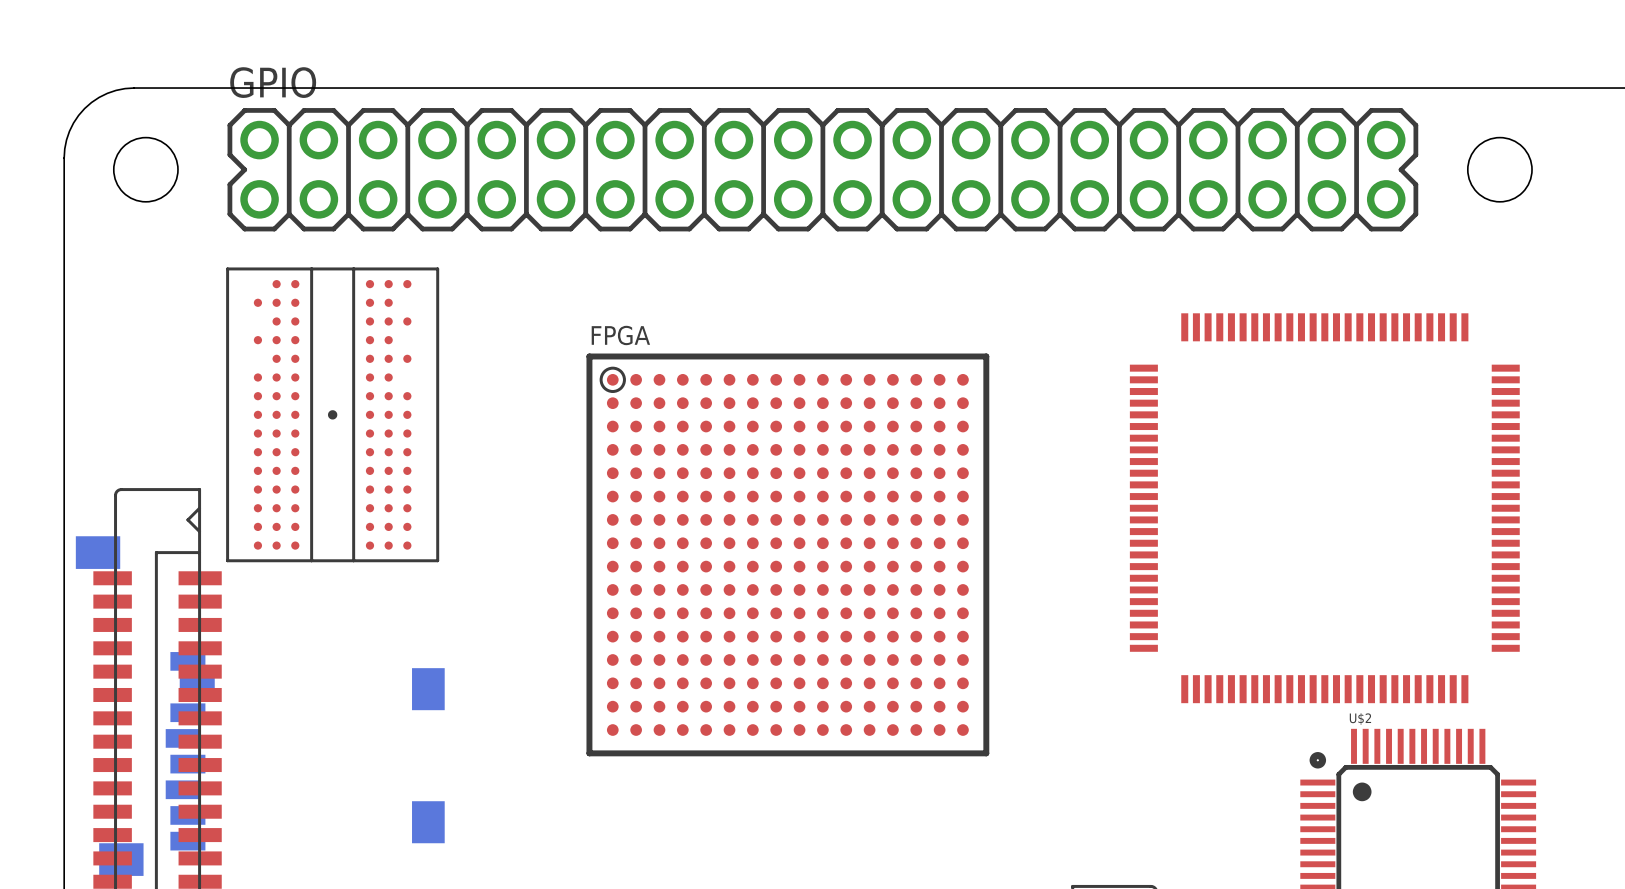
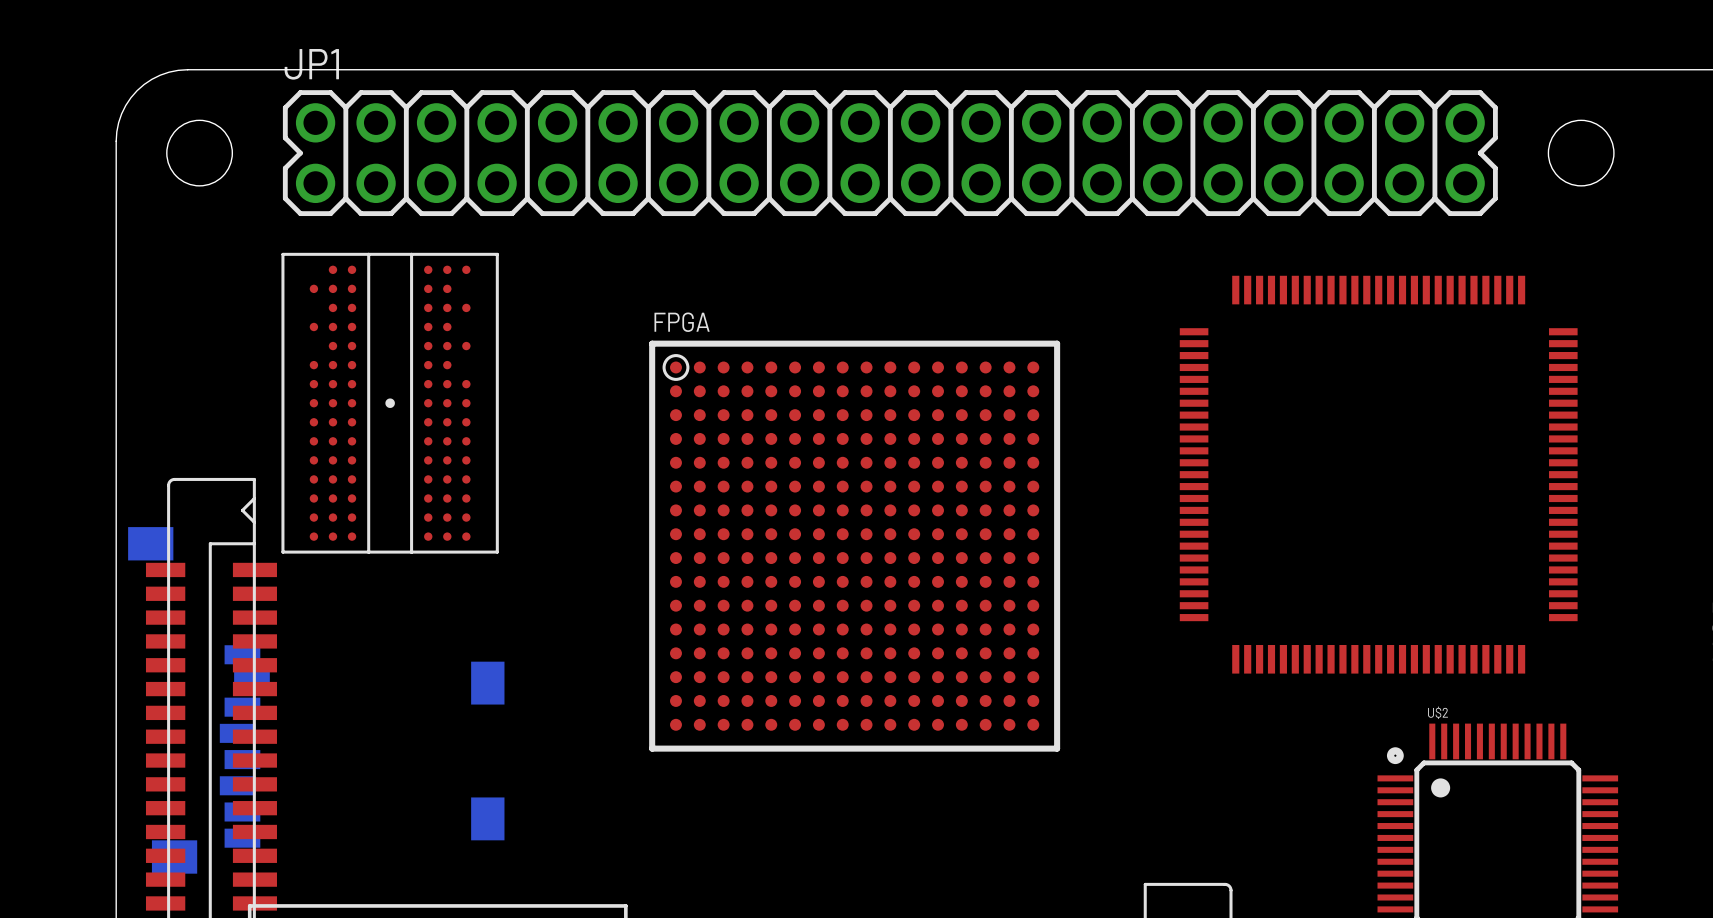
GPIO name: GPIO (273, 82) -> JP1 (311, 64)
part position: (1324, 508) -> (1378, 474)

